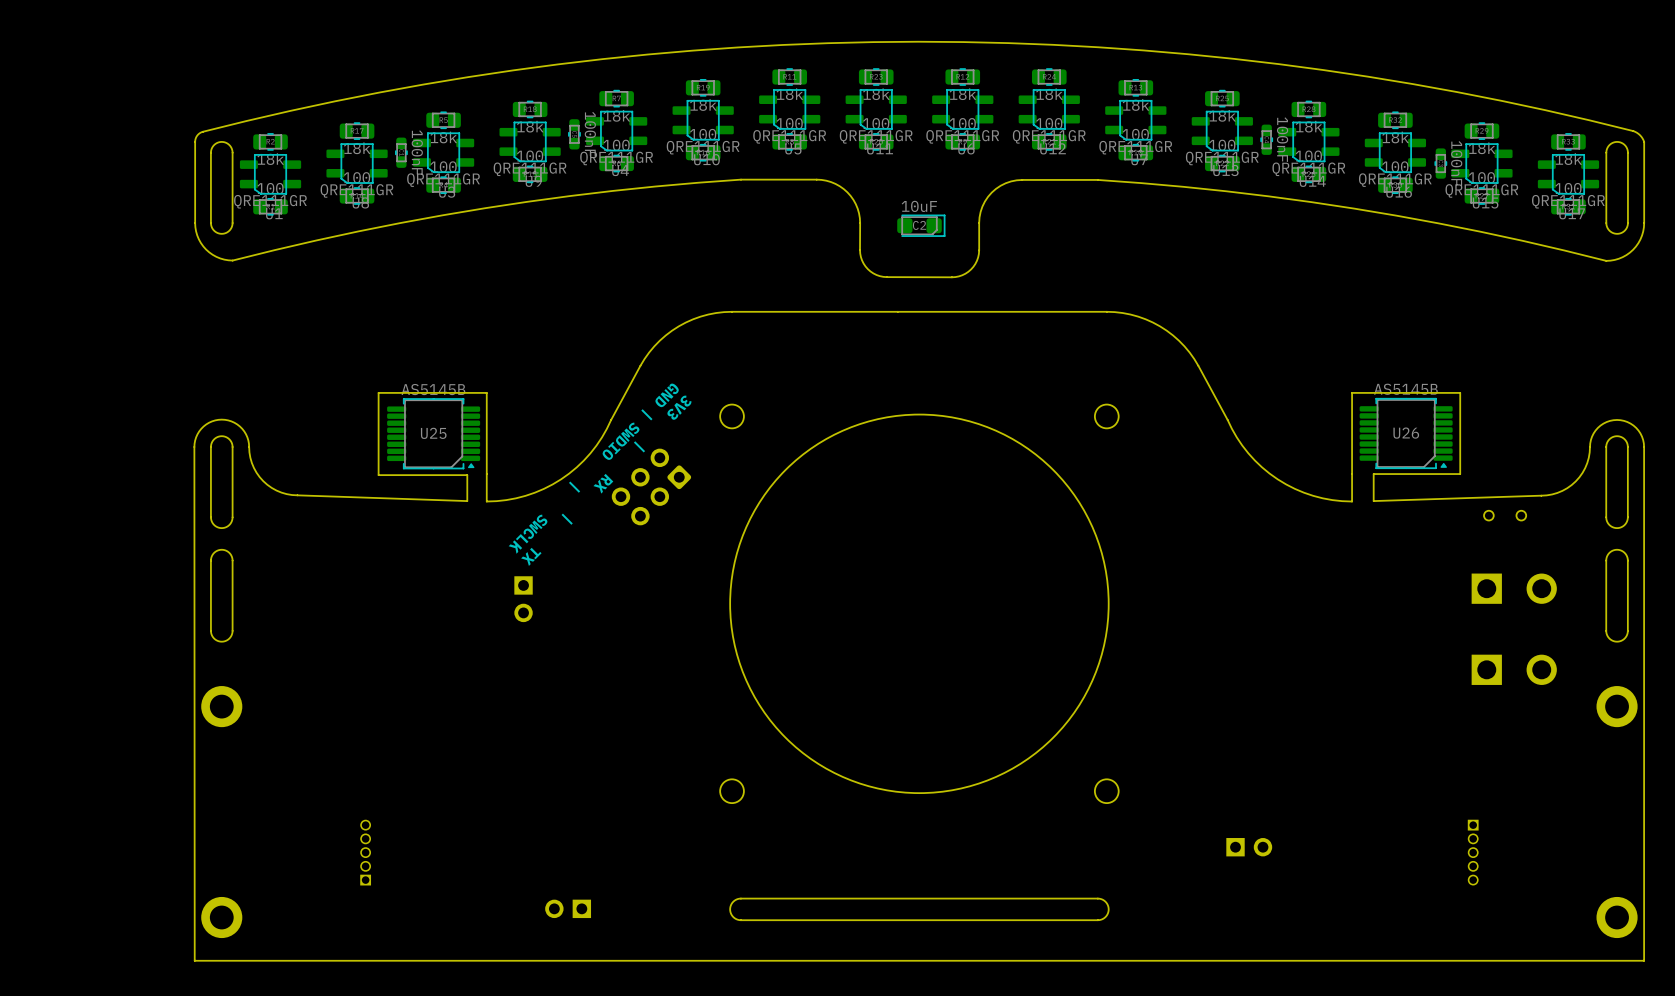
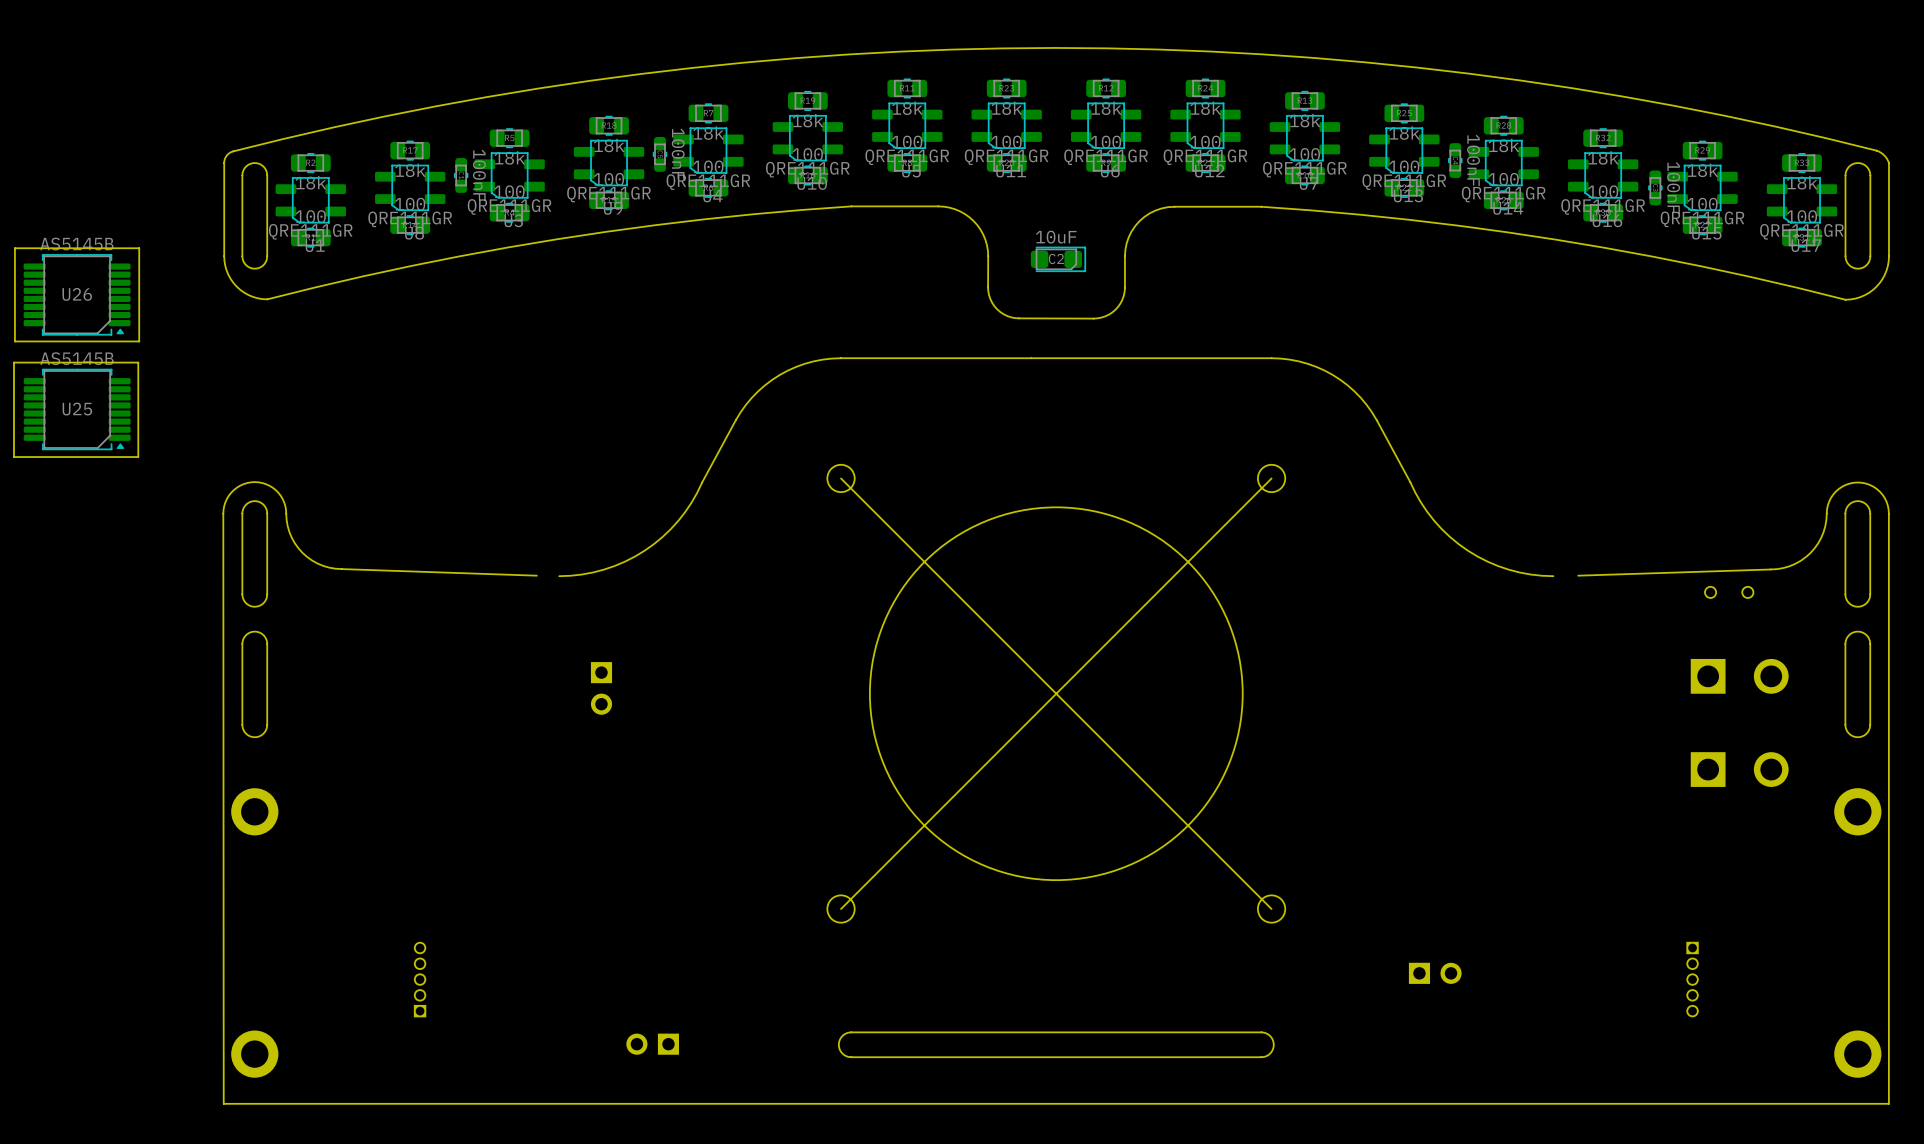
board edge: none -> (139, 248) (14, 248) (14, 341) (139, 341) (139, 248)
board edge: none -> (138, 362) (14, 362) (14, 457) (138, 457) (138, 362)
round board edge size: [729, 414, 1109, 794] -> [869, 507, 1244, 881]
board edge: none -> (841, 478) (1271, 909)
board edge: none -> (1271, 478) (841, 909)
U25 position: (433, 433) -> (77, 409)
U26 position: (1406, 433) -> (77, 294)
text: GND | SWDIO | SWCLK (593, 468) -> none
text: 3V3 | RX | TX (606, 480) -> none
part: (651, 486) -> none
board edge: (467, 501) (467, 475) (378, 475) (378, 392) (486, 392) (486, 501) -> none
board edge: (1373, 501) (1373, 474) (1460, 474) (1460, 392) (1352, 392) (1352, 501) -> none

